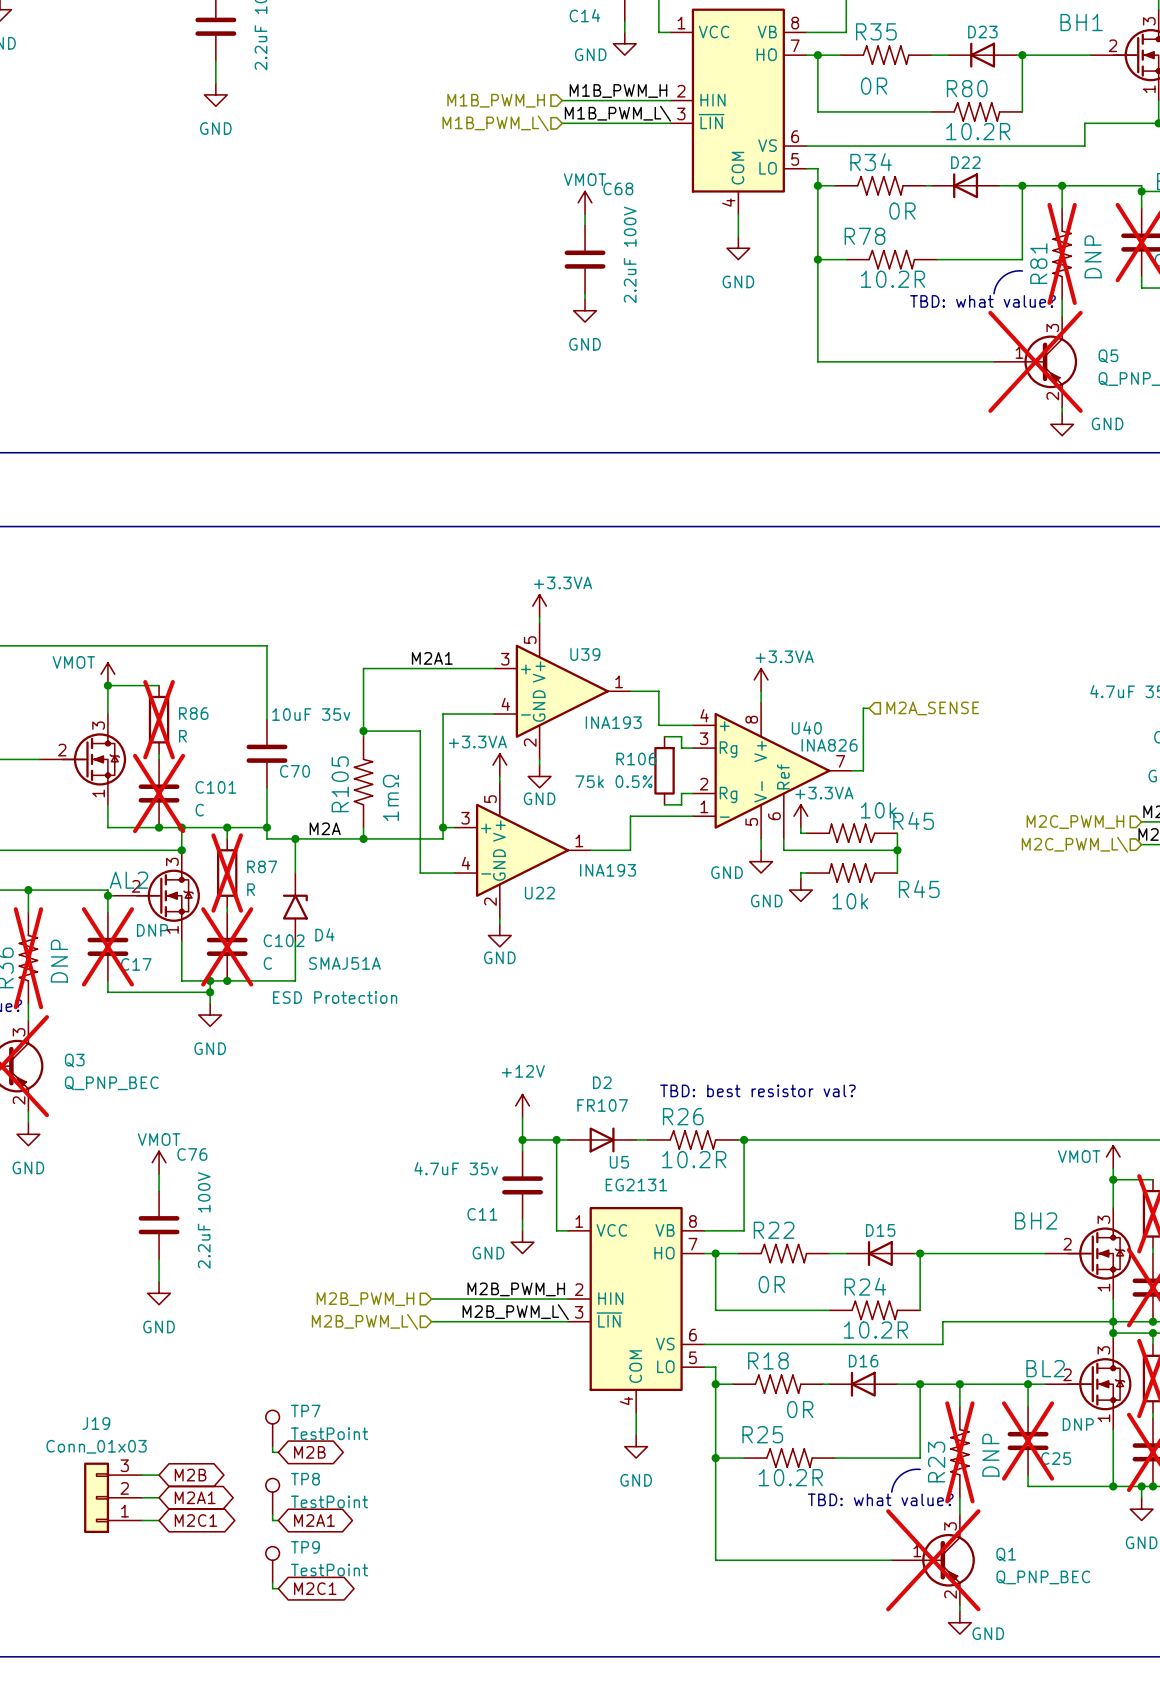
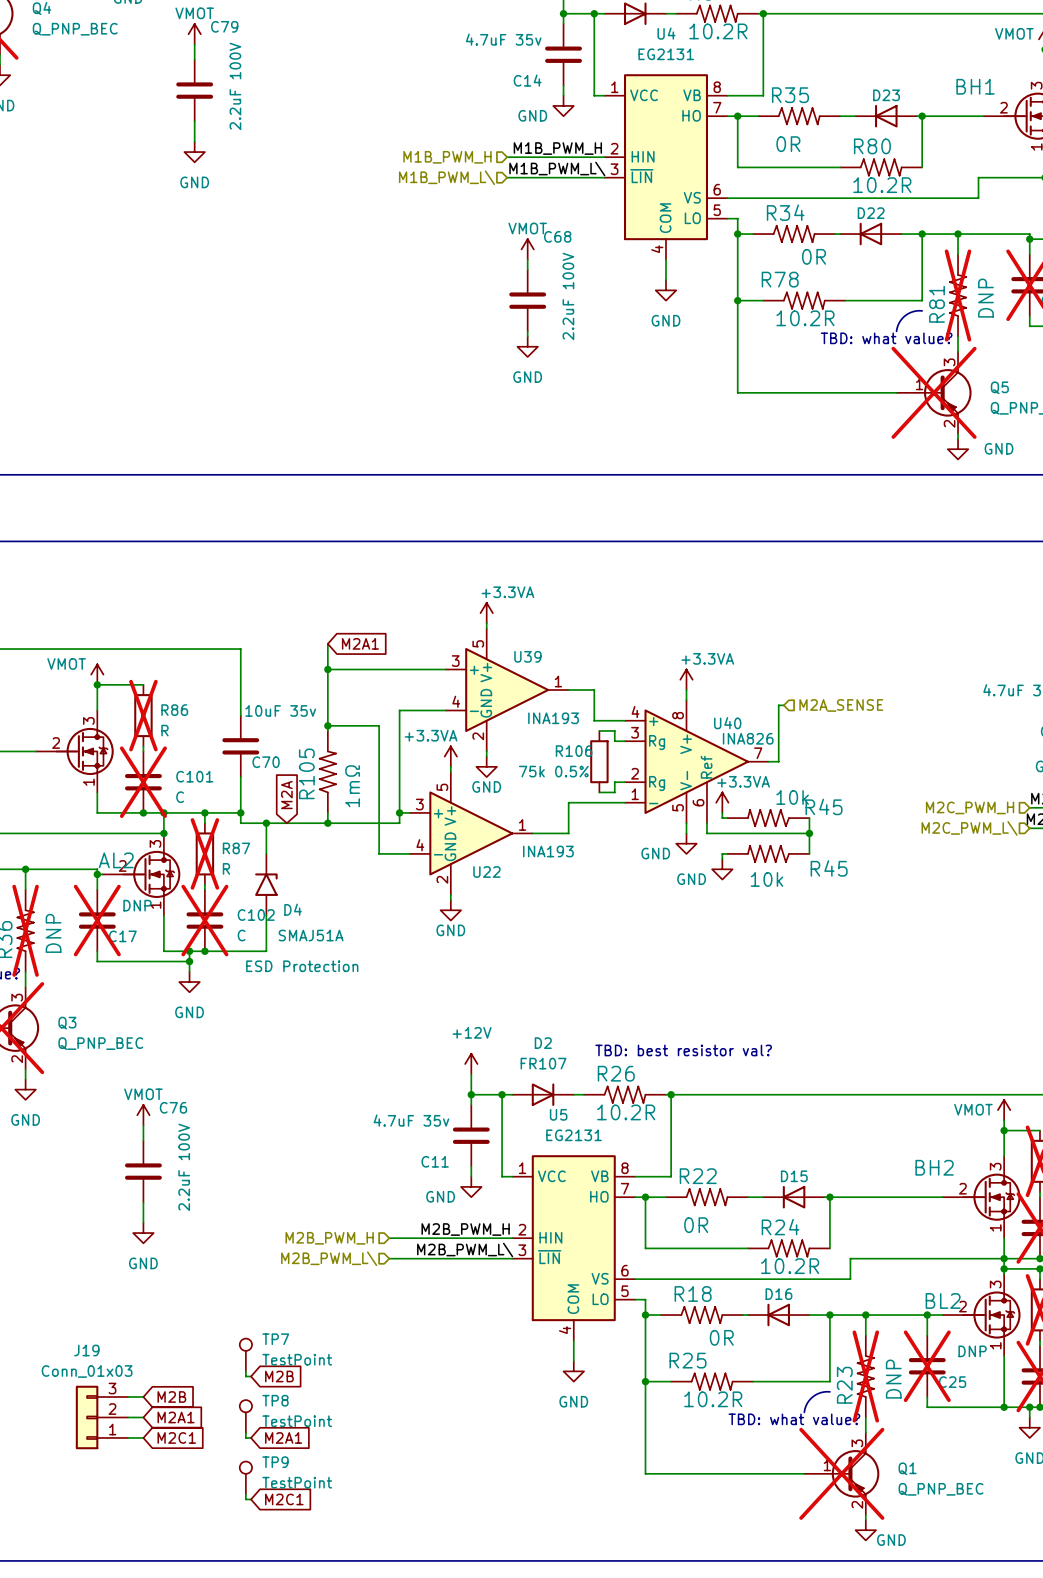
wire: none -> (327, 643) (327, 669)
global label: none -> M2A1 (360, 643)
label: M2A1 (432, 658) -> none
junction: none -> (327, 669)
global label: none -> M2A (286, 795)
label: M2A (325, 828) -> none
global label shape: bidirectional (309, 1452) -> input (279, 1376)
global label shape: bidirectional (190, 1475) -> input (171, 1396)
global label shape: bidirectional (195, 1497) -> input (176, 1417)
global label shape: bidirectional (195, 1520) -> input (176, 1437)
global label shape: bidirectional (314, 1520) -> input (283, 1437)
global label shape: bidirectional (315, 1588) -> input (284, 1499)

